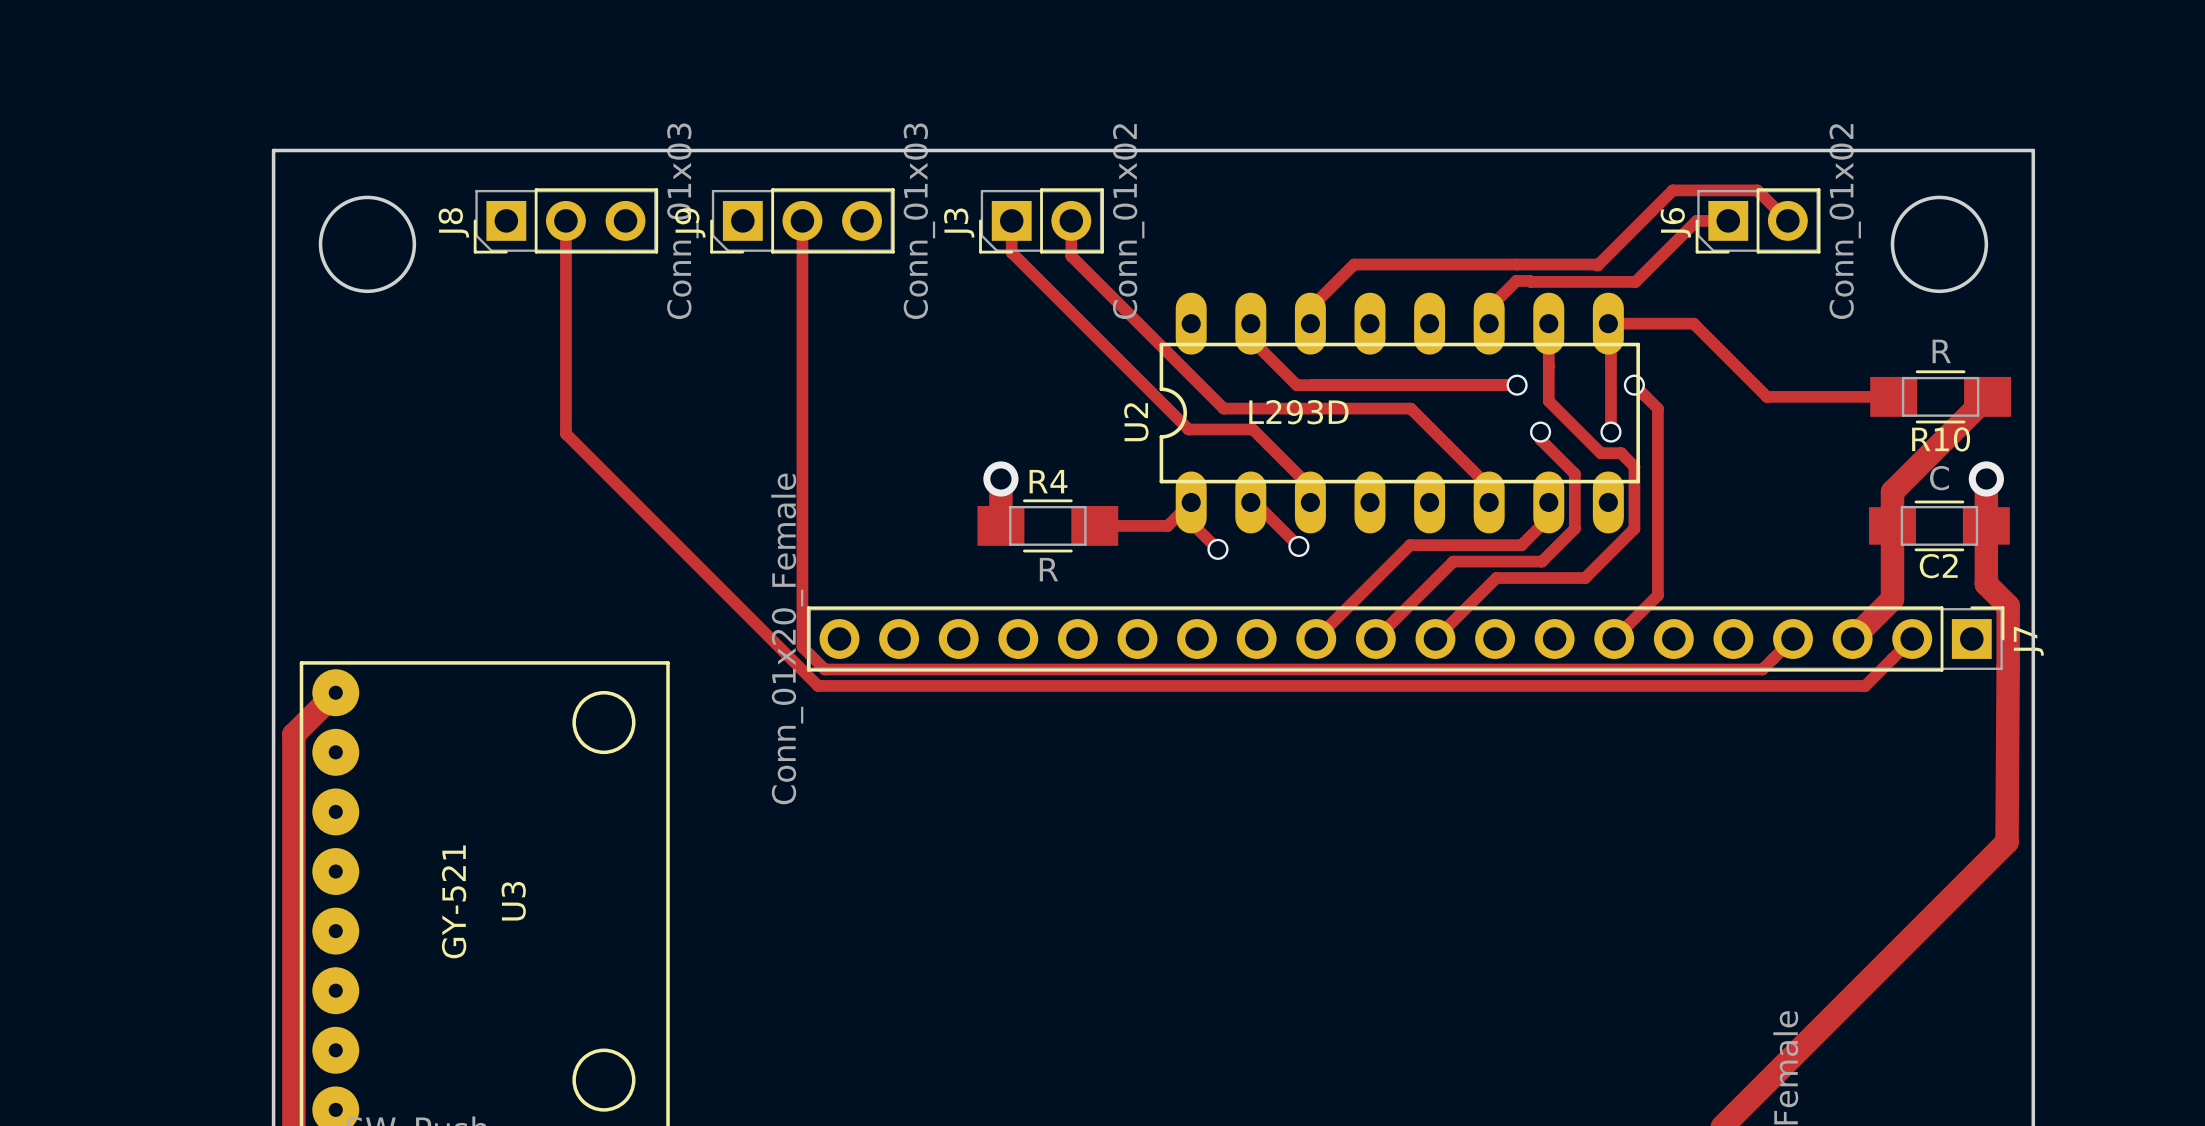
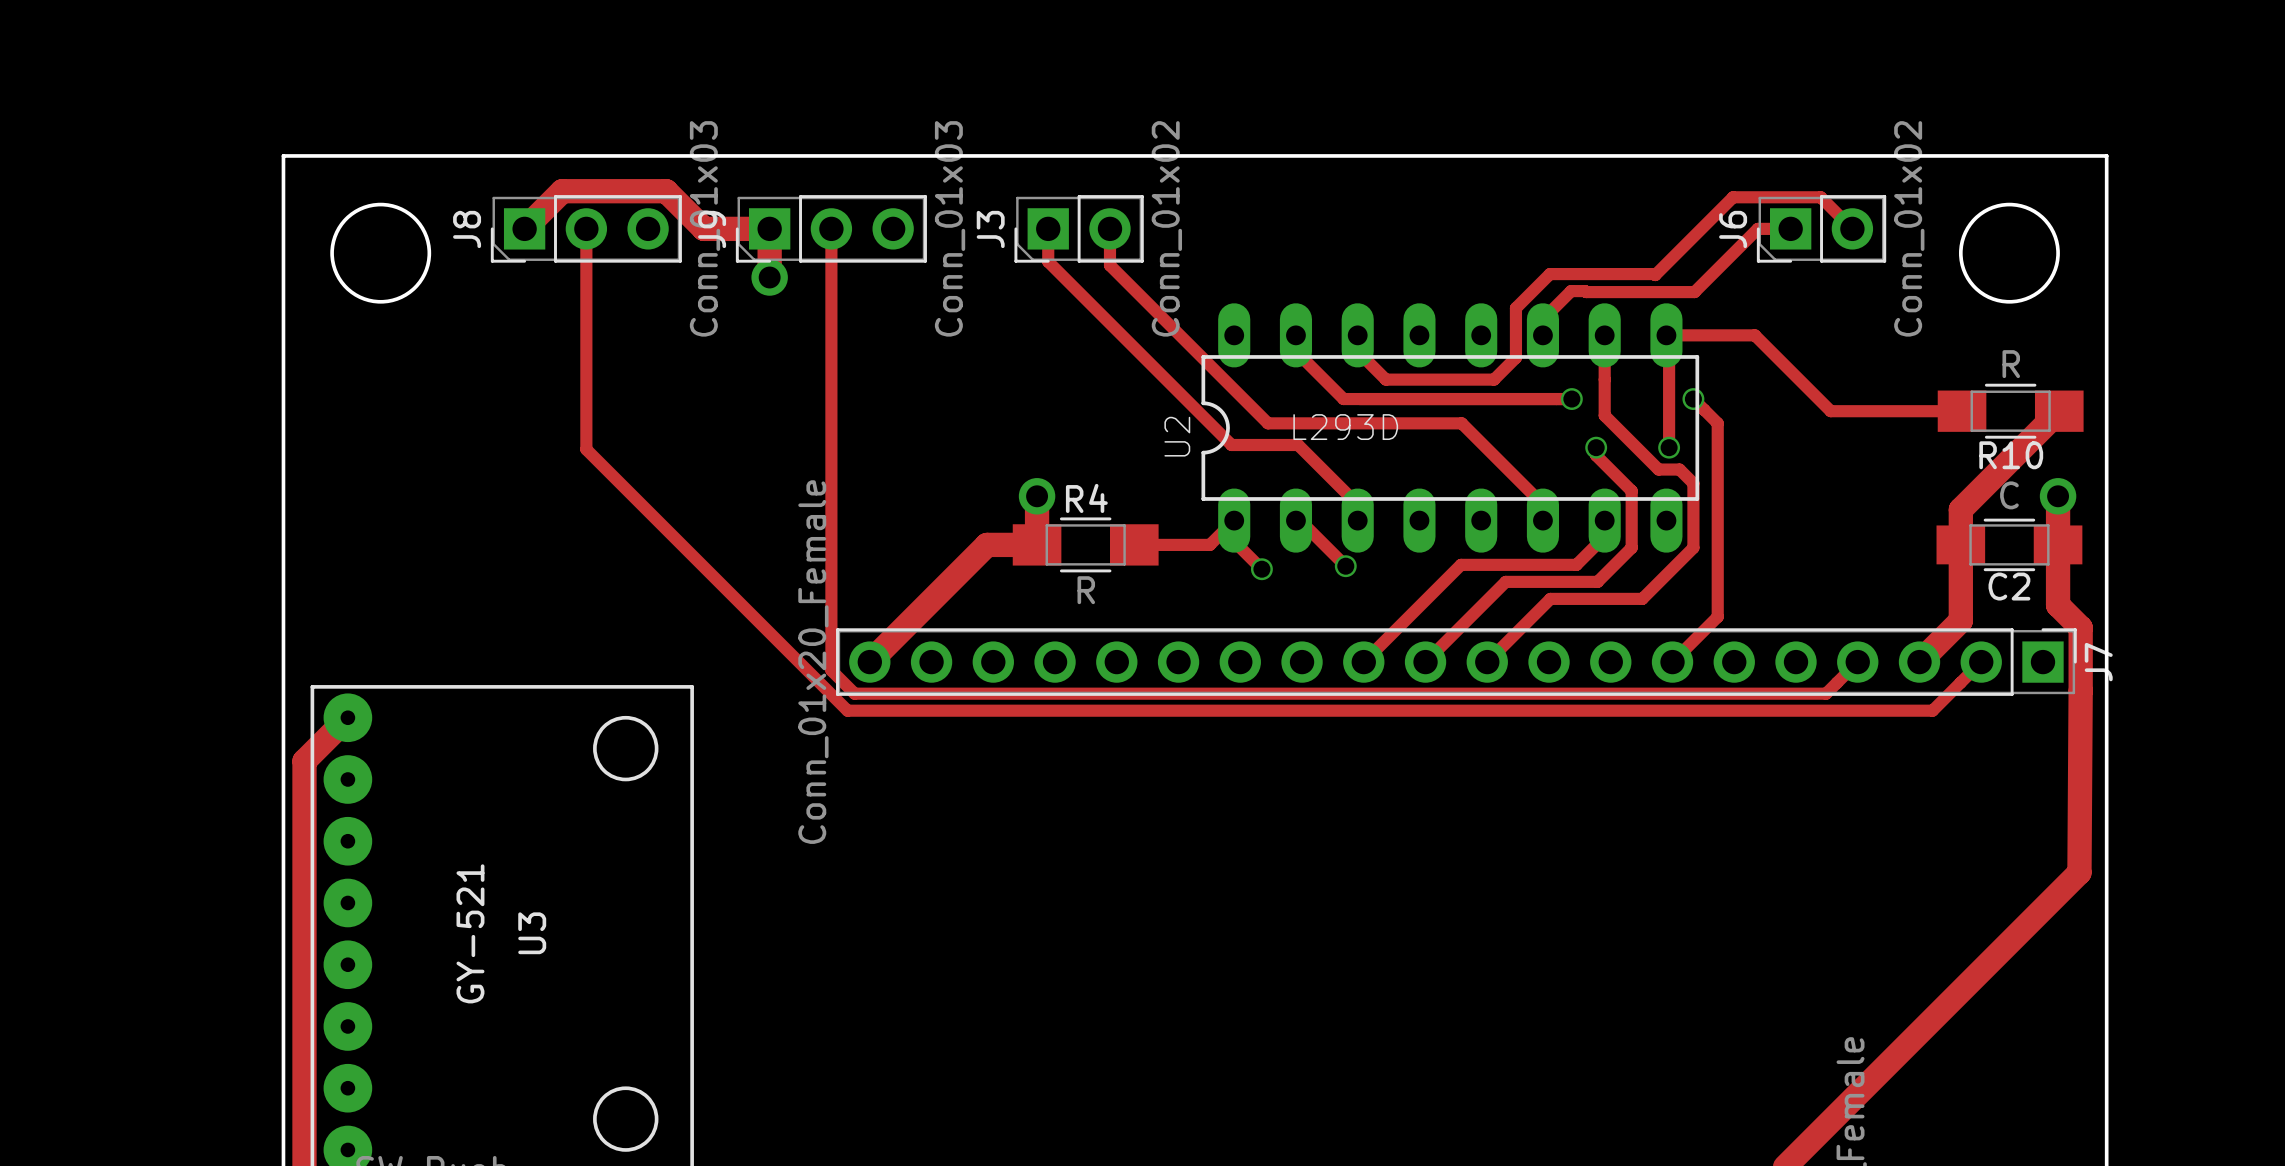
track: none -> (524, 228) (562, 191) (666, 191) (703, 228) (769, 228) (769, 277)
track: (1495, 264) (1354, 264) (1310, 308) -> (1549, 274) (1515, 308) (1515, 357) (1494, 379) (1385, 379) (1357, 351)
via: none -> (769, 277)
track: none -> (1037, 544) (986, 544) (869, 662)

